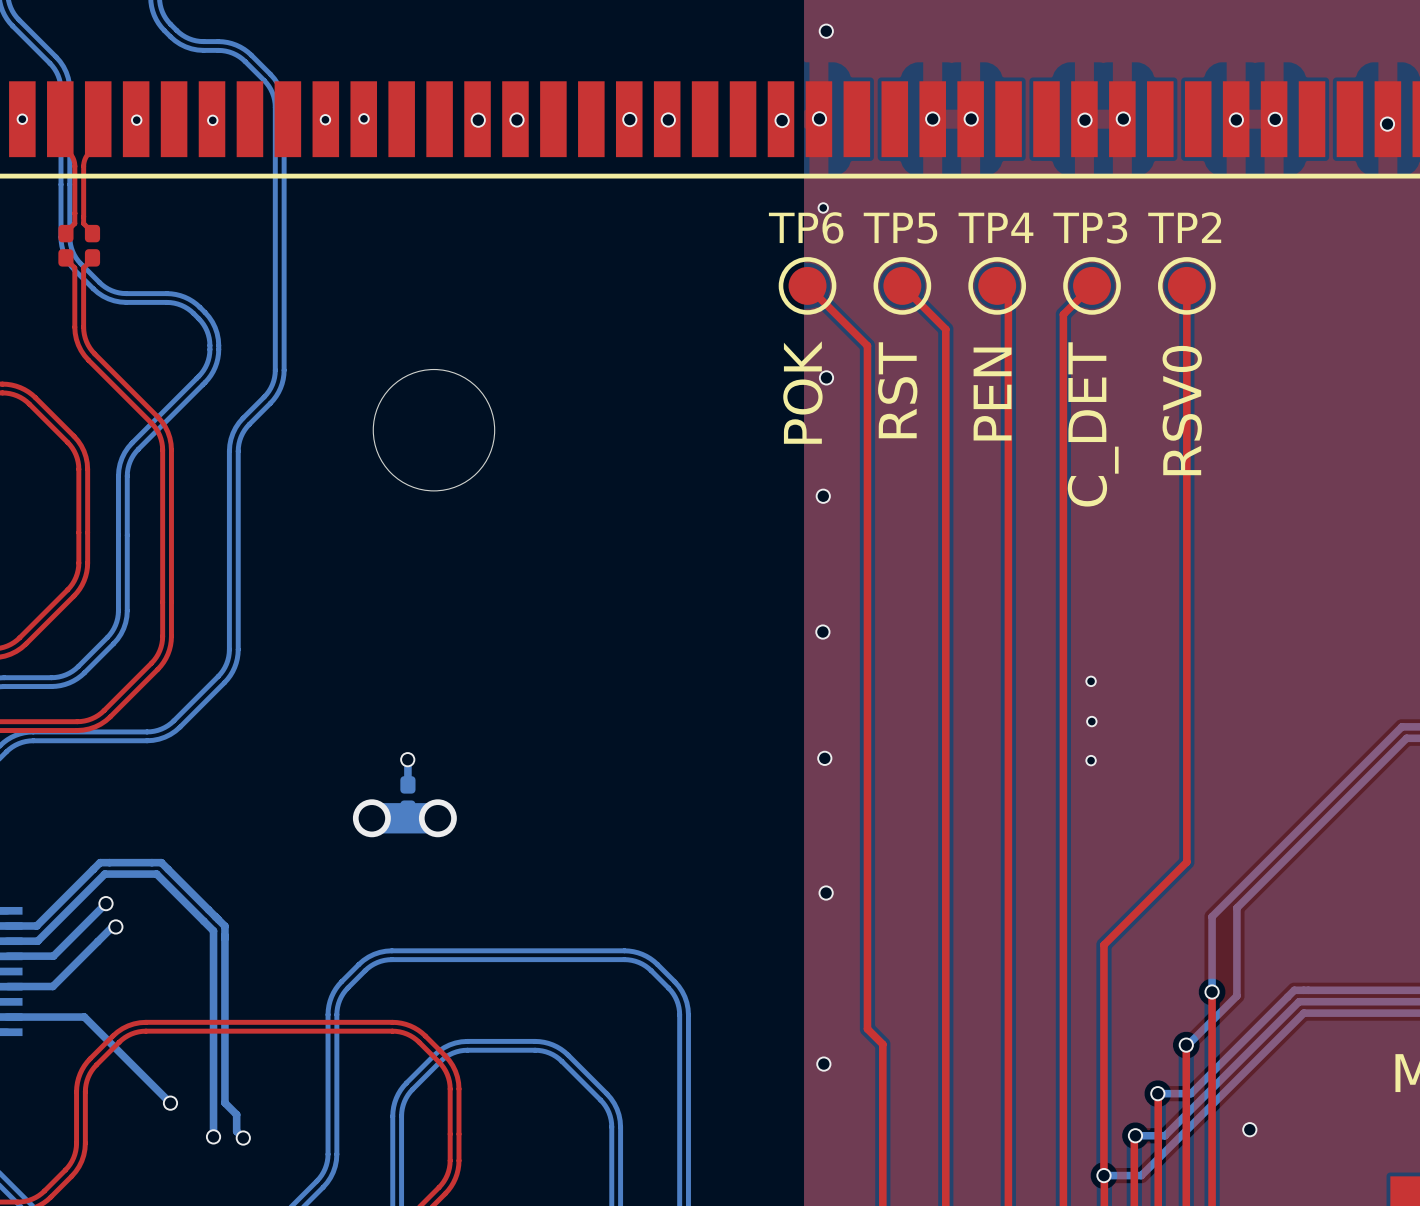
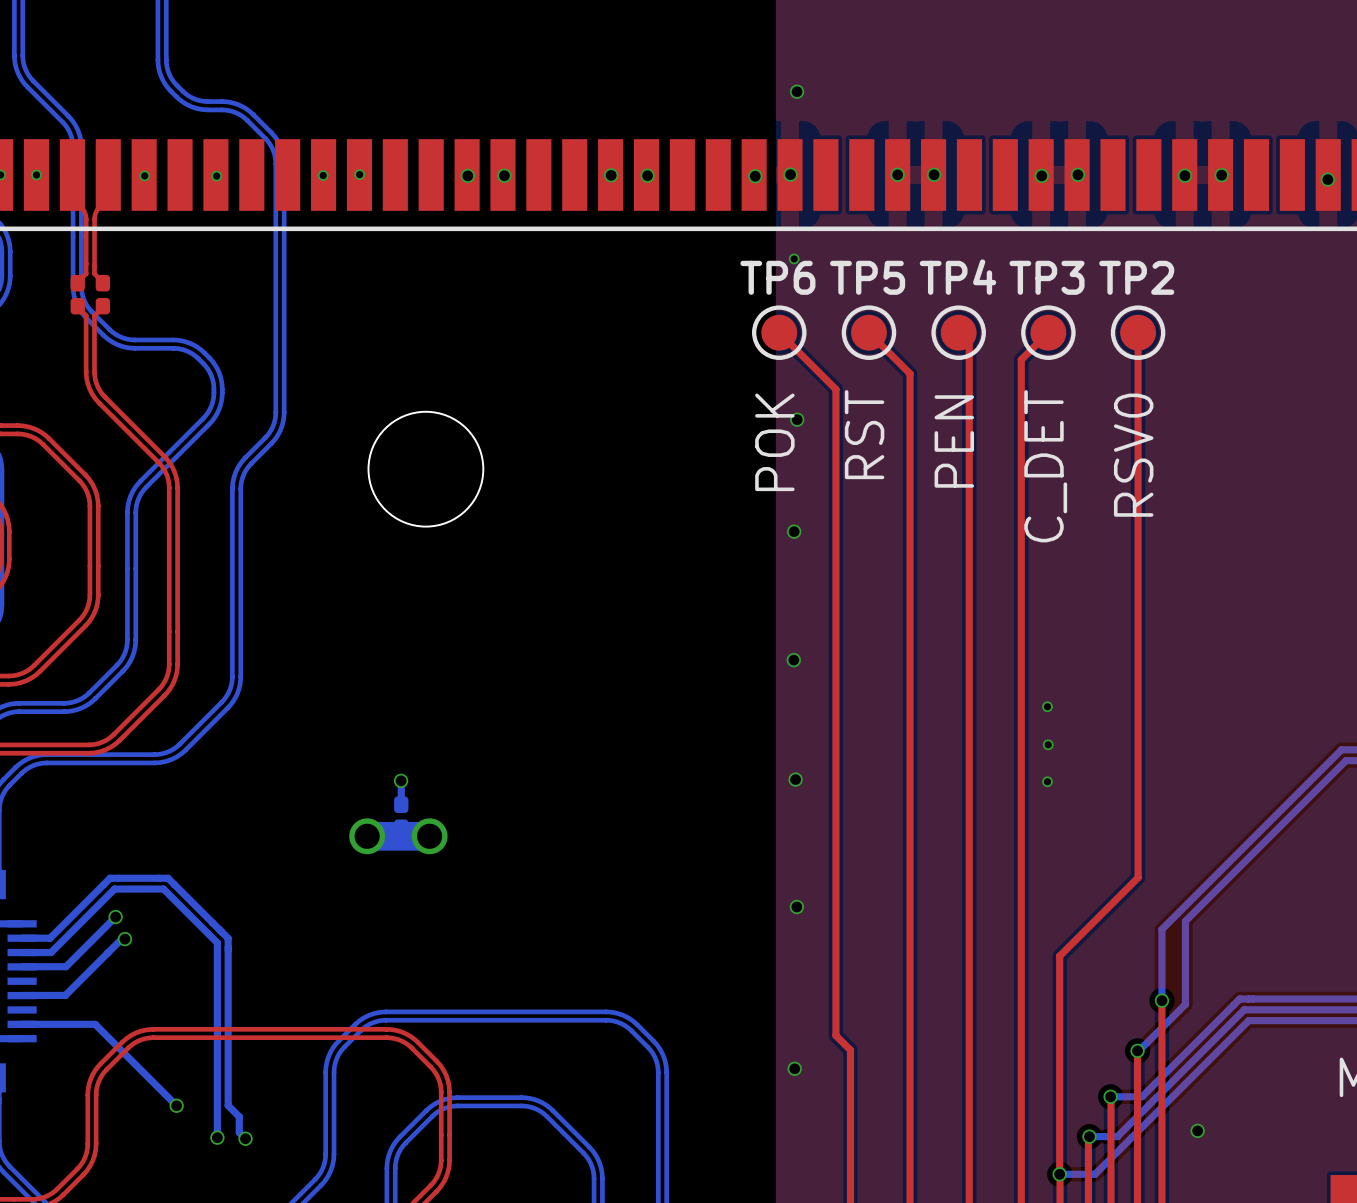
bottom track: (328, 1067) (328, 1010) (331, 996) (338, 985) (358, 964) (374, 954) (391, 950) (624, 950) (637, 952) (650, 958) (682, 991) (688, 1008) (688, 1067) -> (325, 1072) (329, 1055) (335, 1044) (359, 1021) (374, 1013) (606, 1011) (618, 1013) (630, 1019) (653, 1041) (663, 1055) (666, 1072)
bottom track: (336, 1067) (336, 1014) (339, 1000) (345, 990) (365, 970) (377, 962) (391, 959) (624, 959) (635, 961) (645, 966) (675, 996) (679, 1011) (679, 1067) -> (334, 1072) (336, 1058) (342, 1049) (363, 1028) (379, 1020) (606, 1020) (616, 1021) (625, 1026) (647, 1047) (655, 1058) (658, 1072)
bottom track: (392, 1169) (392, 1111) (396, 1098) (403, 1086) (434, 1055) (444, 1047) (461, 1041) (535, 1041) (548, 1043) (564, 1052) (614, 1103) (620, 1120) (620, 1180) -> (386, 1168) (390, 1151) (396, 1140) (435, 1103) (451, 1097) (521, 1097) (538, 1100) (552, 1110) (593, 1151) (600, 1167) (602, 1178)
bottom track: (401, 1169) (401, 1116) (404, 1101) (412, 1089) (443, 1058) (452, 1053) (463, 1050) (538, 1050) (549, 1053) (559, 1058) (607, 1109) (611, 1123) (611, 1180) -> (395, 1168) (396, 1157) (403, 1145) (440, 1110) (457, 1105) (525, 1106) (535, 1108) (544, 1114) (583, 1153) (591, 1164) (594, 1178)

